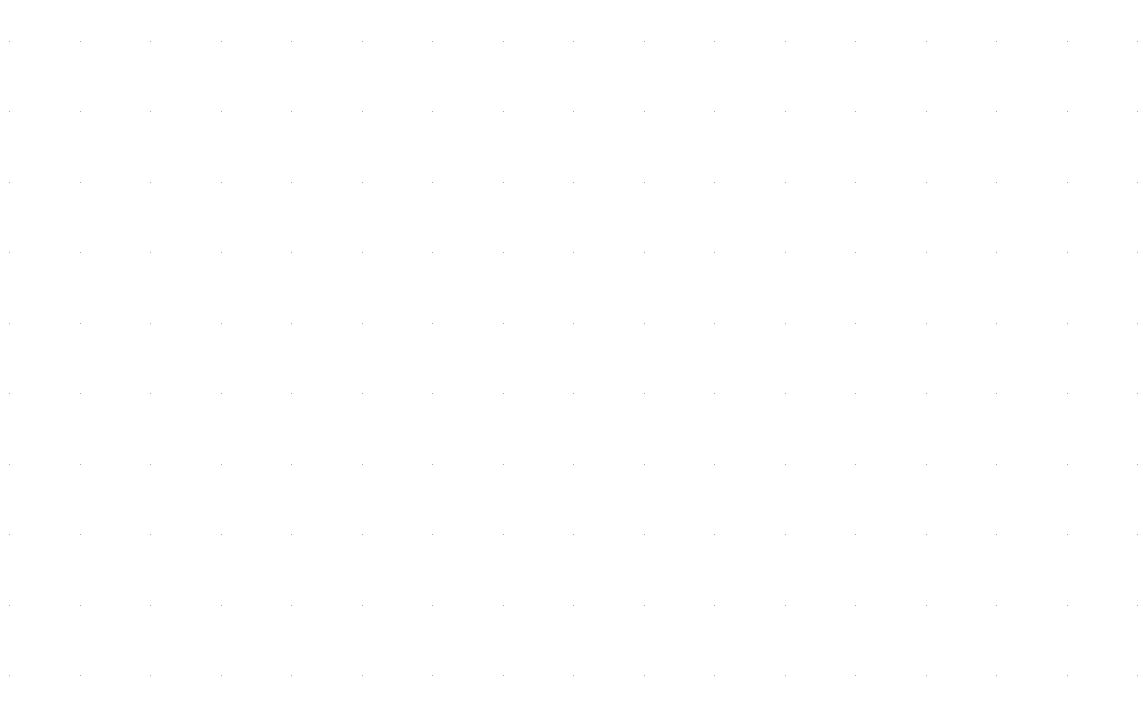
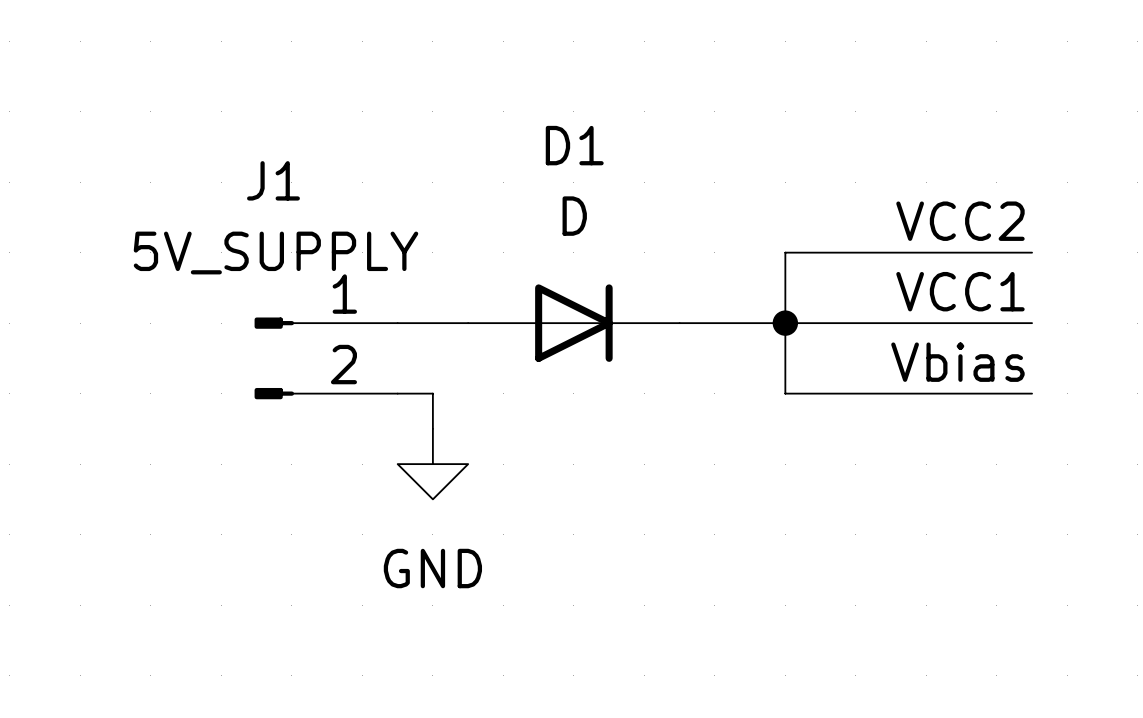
label: none -> VCC2 (960, 221)
wire: none -> (1032, 252) (785, 252) (785, 393) (1032, 393)
label: none -> VCC1 (960, 291)
wire: none -> (397, 323) (468, 323)
D1: none -> D (573, 323)
wire: none -> (679, 323) (1032, 323)
junction: none -> (785, 323)
J1: none -> 5V_SUPPLY (326, 358)
label: none -> Vbias (957, 362)
wire: none -> (397, 393) (432, 393) (432, 428)
power symbol: none -> GND (432, 464)

